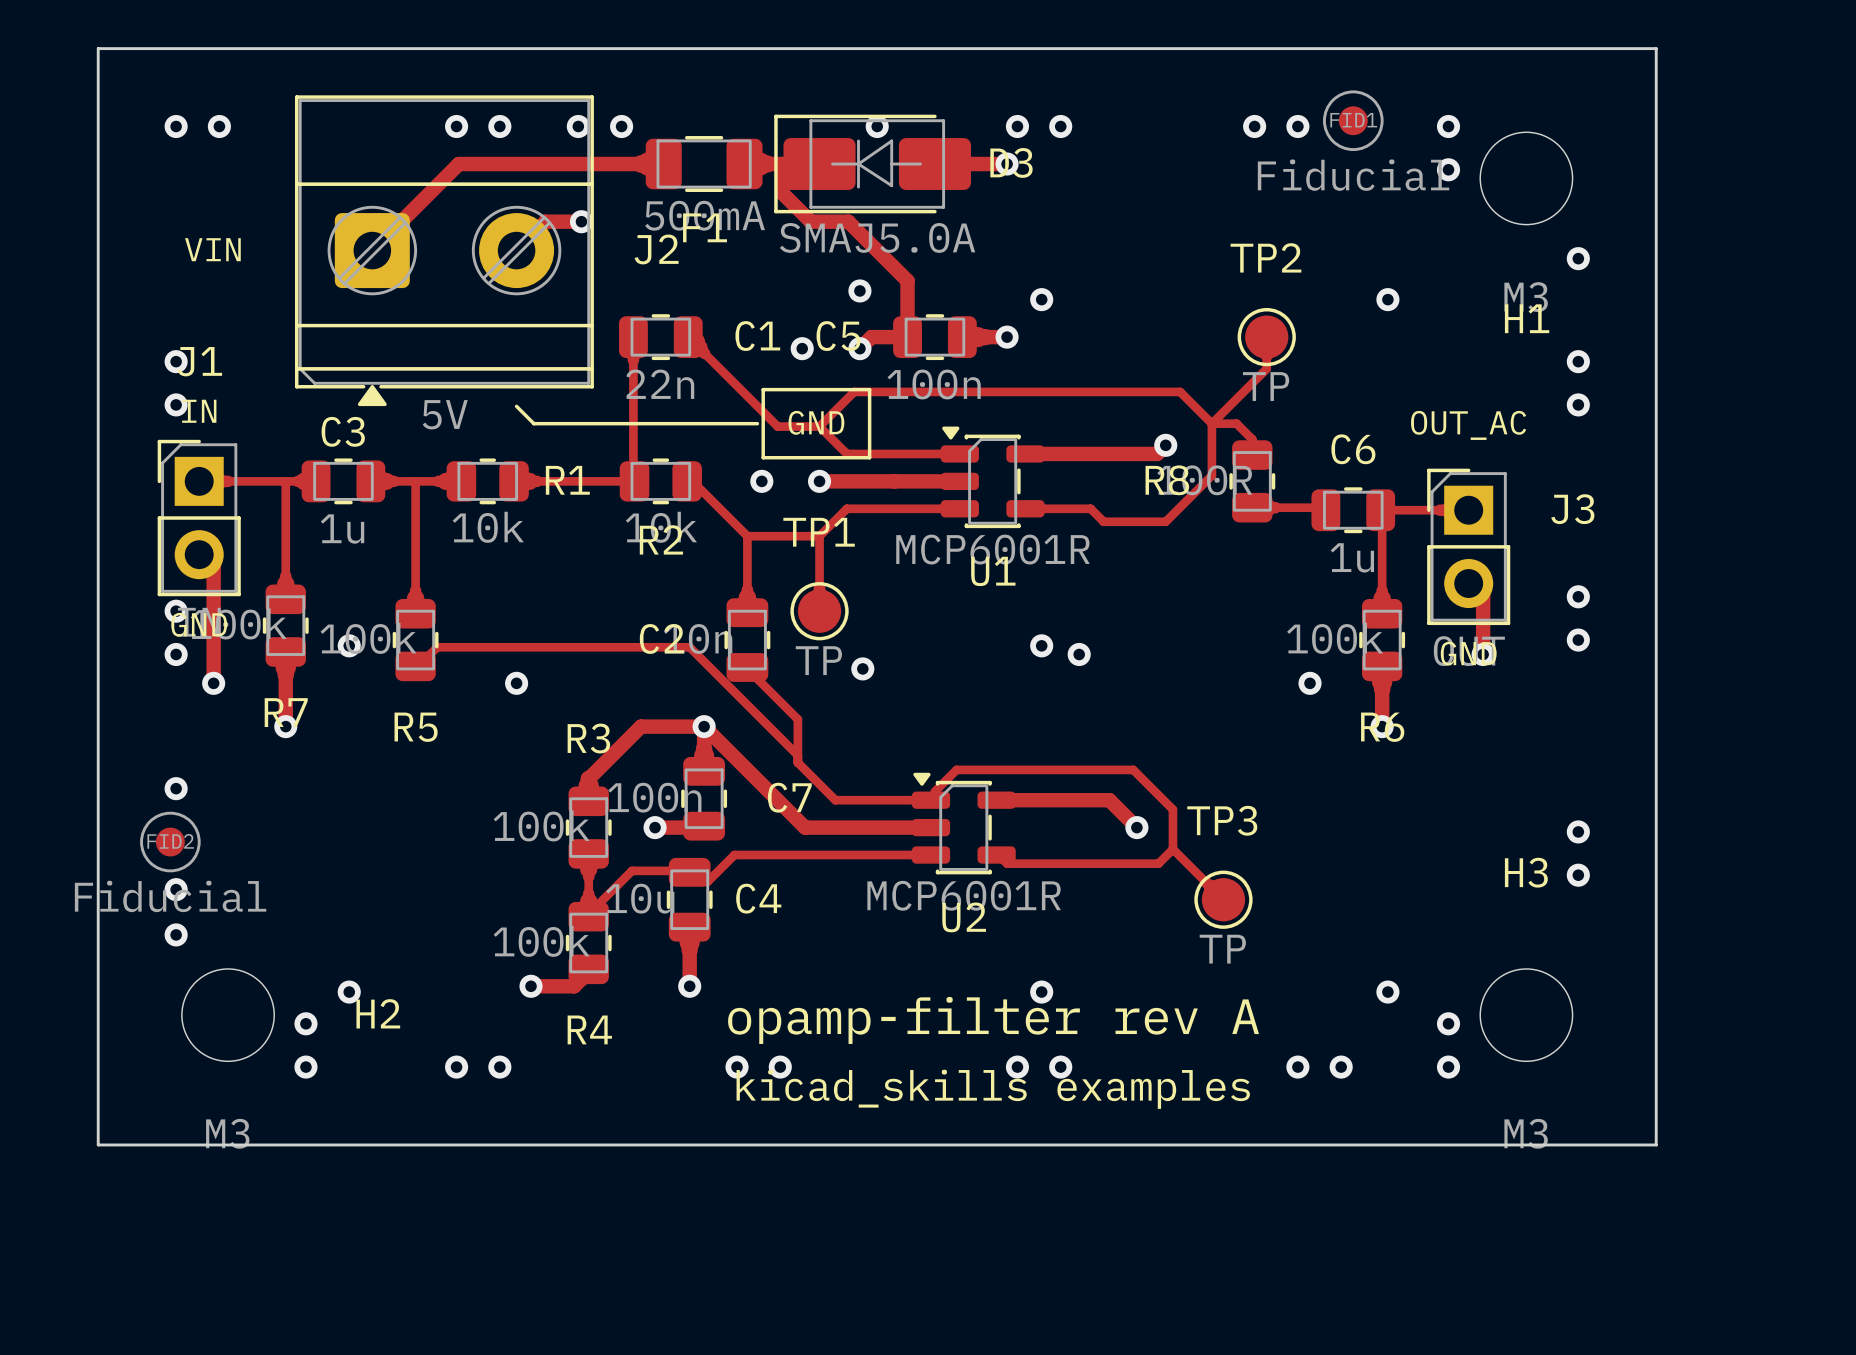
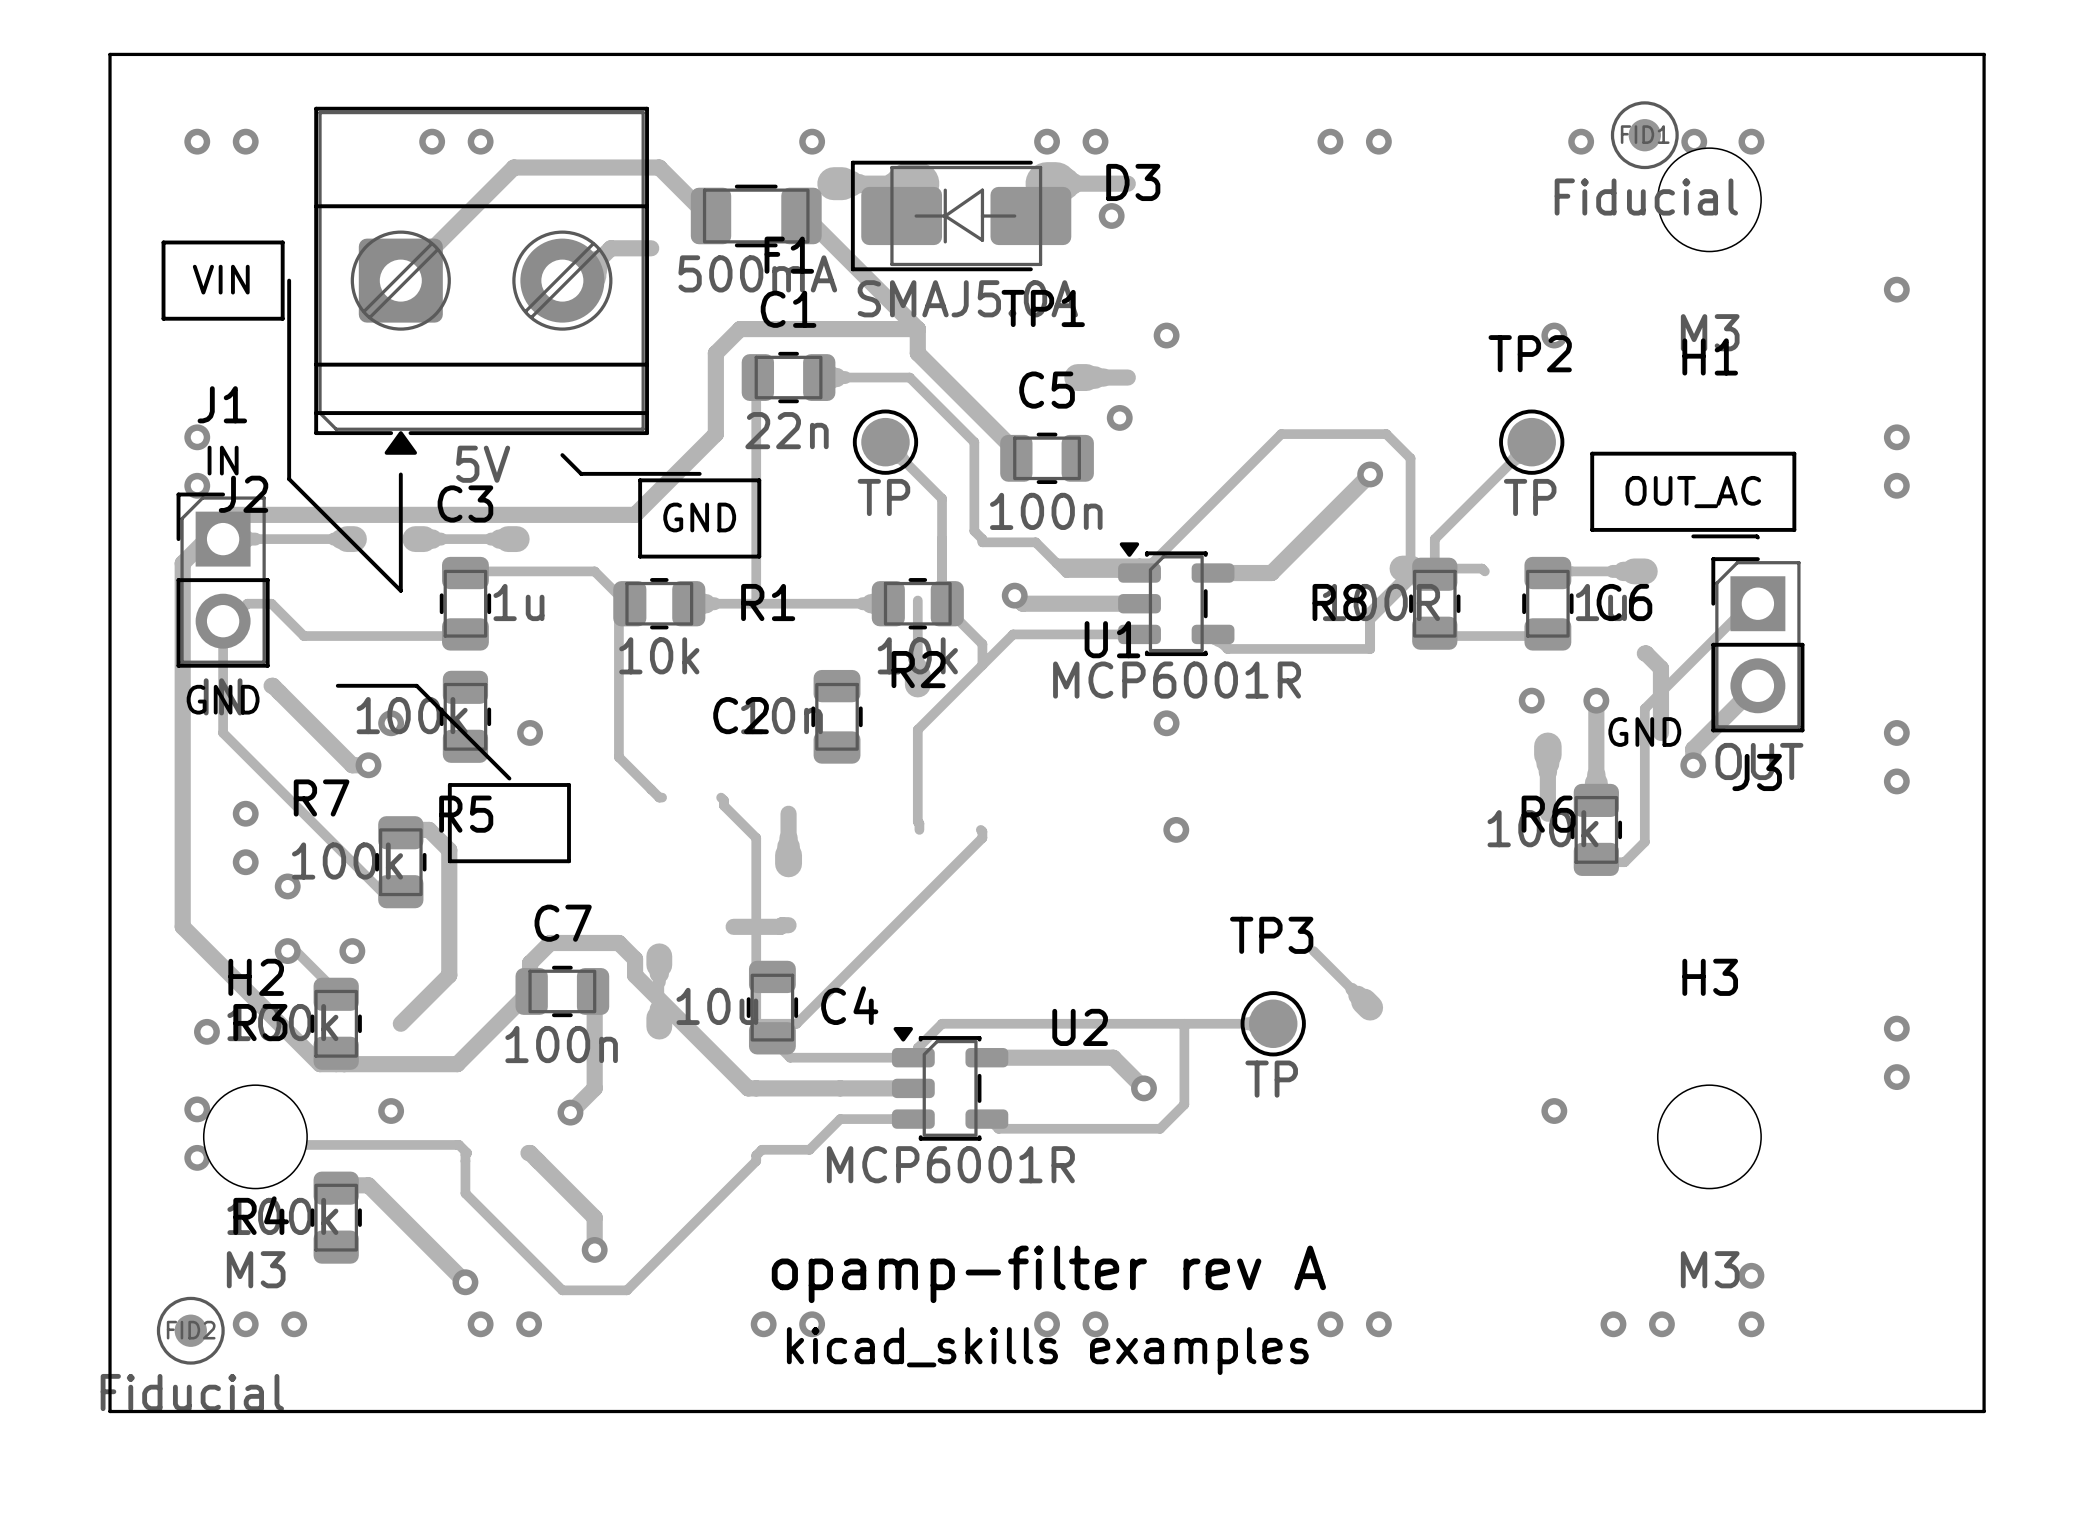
board edge: (1656, 48) (1656, 1144) (98, 1144) -> (1854, 54) (1984, 54) (1984, 1411) (110, 1411) (110, 1282)
FID1 position: (1353, 120) -> (1644, 135)
via: none -> (432, 141)
via position: (456, 126) -> (480, 141)
via: (499, 126) -> none
via: (578, 126) -> none
via: (621, 126) -> none
via: none -> (812, 141)
via: (877, 126) -> none
via: none -> (1047, 141)
via: none -> (1095, 141)
via: (1017, 126) -> none
via: (1060, 126) -> none
via: none -> (1330, 141)
via position: (1254, 126) -> (1378, 141)
via: (1297, 126) -> none
via: none -> (1581, 141)
via: (1448, 126) -> none
via: none -> (1694, 141)
via: none -> (1751, 141)
track: (663, 164) (458, 164) (372, 250) -> none
F1 position: (704, 164) -> (756, 215)
track: (782, 164) (782, 192) (810, 221) (848, 221) (907, 280) (907, 337) (871, 337) (859, 348) -> none
D3 position: (872, 164) -> (961, 215)
via: (1007, 164) -> none
via: (1448, 169) -> none
track: none -> (711, 215) (702, 207) (699, 207) (659, 167) (513, 167) (400, 280)
track: none -> (804, 215) (917, 329)
via: none -> (1111, 215)
line: none -> (163, 242) (282, 242) (282, 318) (163, 318) (163, 242)
via: (581, 221) -> none
text position: VIN (212, 249) -> VIN (221, 279)
J2 name position: J2 (656, 249) -> J2 (243, 494)
line: none -> (289, 280) (289, 479) (400, 590) (400, 474)
J2 position: (444, 250) -> (481, 280)
via: (1578, 258) -> none
via: none -> (1896, 289)
via: (859, 290) -> none
track: none -> (917, 329) (740, 329) (715, 353) (715, 434) (635, 514) (231, 514) (182, 563) (182, 926) (320, 1064) (457, 1064) (530, 991) (530, 963) (550, 942) (618, 942) (635, 959) (635, 975) (748, 1088) (913, 1088)
track: none -> (917, 329) (917, 353) (1014, 450) (1016, 458)
C1 name position: C1 (757, 336) -> C1 (788, 309)
C5 name position: C5 (838, 336) -> C5 (1047, 390)
track: (633, 337) (633, 481) (514, 481) -> none
C1 position: (660, 337) -> (788, 377)
track: none -> (757, 377) (756, 385) (756, 603)
track: (688, 337) (777, 426) (819, 426) -> none
track: none -> (819, 377) (909, 377) (974, 442) (974, 531) (982, 539) (982, 542) (1035, 542) (1066, 573) (1139, 573)
C5 position: (934, 337) -> (1047, 458)
via position: (1007, 337) -> (1119, 417)
track: (1266, 337) (1266, 368) (1211, 423) -> none
TP2 position: (1266, 337) -> (1531, 442)
via: (802, 348) -> none
via: (859, 348) -> none
via: (176, 361) -> none
via: (1578, 361) -> none
line: (763, 389) (869, 389) (869, 457) (763, 457) (763, 389) -> (640, 480) (759, 480) (759, 556) (640, 556) (640, 480)
via: none -> (1896, 437)
track: none -> (885, 442) (942, 498) (942, 603) (982, 644) (982, 665)
track: none -> (1531, 442) (1434, 539) (1434, 571) (1418, 571) (1370, 619)
via position: (176, 404) -> (197, 437)
via: (1578, 404) -> none
line: none -> (1592, 453) (1794, 453) (1794, 529) (1592, 529) (1592, 453)
line: none -> (562, 455) (581, 473) (699, 473)
line: (516, 406) (533, 423) (757, 423) -> none
text position: GND (816, 422) -> GND (699, 517)
track: (1211, 423) (1236, 423) (1252, 439) (1252, 455) -> none
track: (1211, 423) (1180, 391) (854, 391) (819, 426) -> none
track: (1211, 423) (1211, 475) (1165, 521) (1103, 521) (1090, 508) (1025, 508) -> none
track: none -> (1370, 474) (1271, 573) (1213, 573)
text position: OUT_AC (1468, 425) -> OUT_AC (1693, 492)
track: (819, 426) (846, 453) (959, 453) -> none
via: none -> (197, 485)
via: none -> (1896, 485)
track: (1165, 445) (1157, 453) (1025, 453) -> none
via position: (1165, 445) -> (1370, 474)
U1 position: (992, 477) -> (1176, 599)
line: none -> (1693, 536) (1757, 537)
R1 name position: R1 (567, 480) -> R1 (768, 602)
track: (285, 481) (285, 599) -> none
C3 rotation: 0° (343, 481) -> 90° clockwise (465, 603)
C3 position: (343, 481) -> (465, 603)
track: (415, 481) (415, 613) -> none
R1 position: (487, 481) -> (659, 603)
R2 position: (660, 481) -> (917, 603)
track: (687, 481) (692, 481) (747, 536) -> none
via: (761, 481) -> none
track: (819, 481) (959, 481) -> none
via: (819, 481) -> none
R8 position: (1252, 481) -> (1434, 603)
track: none -> (1056, 563) (1152, 563) (1281, 434) (1386, 434) (1410, 458) (1410, 571) (1370, 611) (1370, 648) (1227, 648) (1213, 634)
track: (959, 508) (846, 508) (819, 536) (747, 536) -> none
J3 name position: J3 (1572, 509) -> J3 (1757, 772)
C6 rotation: 0° (1353, 510) -> 90° clockwise (1547, 603)
track: (1382, 510) (1382, 613) -> none
track: none -> (465, 573) (473, 571) (594, 571) (618, 595)
C3 value position: 1u (342, 529) -> 1u (518, 602)
track: none -> (618, 595) (618, 757) (659, 797) (662, 797)
track: none -> (1014, 595) (1022, 603) (1139, 603)
via: none -> (1014, 595)
TP1 name position: TP1 (819, 532) -> TP1 (1043, 308)
track: (747, 536) (747, 612) -> none
track: none -> (688, 603) (888, 603)
track: none -> (1757, 603) (1749, 603) (1644, 708) (1644, 842) (1624, 862) (1599, 862) (1596, 859)
J3 position: (1468, 546) -> (1757, 644)
track: (199, 554) (213, 567) (213, 683) -> none
C6 value position: 1u (1352, 557) -> 1u (1601, 602)
track: none -> (1434, 633) (1440, 633) (1442, 636) (1546, 636) (1547, 634)
track: none -> (465, 634) (463, 636) (303, 636) (271, 603) (247, 603) (223, 627) (223, 732) (384, 894) (400, 891)
track: none -> (1139, 634) (1013, 634) (917, 729) (919, 829)
via: (1578, 596) -> none
via: (176, 611) -> none
TP1 position: (819, 611) -> (885, 442)
track: none -> (271, 685) (352, 765) (368, 765)
line: none -> (337, 685) (416, 685) (509, 778)
track: none -> (1757, 685) (1693, 749) (1693, 765)
R7 position: (285, 625) -> (400, 862)
via: none -> (1531, 700)
track: none -> (1596, 700) (1596, 800)
via: none -> (1596, 700)
R6 position: (1382, 640) -> (1596, 829)
via: (1578, 640) -> none
track: (285, 651) (285, 726) -> none
via: (176, 654) -> none
via: (1079, 654) -> none
via: (1483, 654) -> none
via: none -> (1896, 732)
track: (415, 666) (437, 647) (689, 647) (797, 755) -> none
track: (747, 667) (797, 719) (797, 762) (835, 800) (930, 800) (934, 796) (934, 791) (956, 769) (1133, 769) (1172, 809) (1172, 849) (1158, 863) (1007, 863) (996, 855) -> none
via: (862, 668) -> none
via: (213, 683) -> none
via: none -> (368, 765)
via position: (516, 683) -> (530, 732)
via: (1310, 683) -> none
via: none -> (1693, 765)
via: none -> (1896, 781)
line: none -> (449, 784) (569, 784) (569, 861) (449, 861) (449, 784)
track: none -> (721, 797) (723, 800) (723, 805) (756, 837) (756, 1023)
via: none -> (245, 813)
via: (285, 726) -> none
via: (704, 726) -> none
via: (1382, 726) -> none
R3 name position: R3 (588, 738) -> R3 (260, 1022)
track: none -> (980, 829) (982, 837) (796, 1023) (756, 1023)
via: none -> (1176, 829)
track: none -> (400, 832) (406, 832) (408, 829) (429, 829) (449, 850) (449, 975) (400, 1023)
via: none -> (245, 862)
via: (176, 788) -> none
via: none -> (287, 886)
C7 value position: 100n (654, 797) -> 100n (561, 1044)
C7 name position: C7 (789, 797) -> C7 (563, 923)
C7 rotation: 0° (704, 798) -> 90° clockwise (562, 991)
C7 position: (704, 798) -> (562, 991)
track: (996, 800) (1109, 800) (1136, 827) -> (986, 1057) (1113, 1057) (1143, 1088)
track: (588, 801) (588, 778) (640, 726) (704, 726) (805, 827) (930, 827) -> none
U2 position: (963, 823) -> (950, 1083)
R3 position: (588, 827) -> (336, 1023)
via: (655, 827) -> none
via: (1136, 827) -> none
via: (1578, 831) -> none
FID2 position: (170, 842) -> (190, 1330)
track: none -> (287, 951) (295, 951) (336, 991) (336, 994)
via: none -> (287, 951)
via: none -> (352, 951)
track: (930, 855) (734, 855) (707, 881) (700, 881) (688, 870) (631, 870) (588, 914) -> none
via: (1578, 875) -> none
track: none -> (593, 991) (594, 1088) (570, 1112)
via: (176, 889) -> none
TP3 position: (1223, 899) -> (1273, 1023)
track: none -> (756, 1023) (790, 1057) (913, 1057) (917, 1053) (917, 1048) (942, 1023) (1273, 1023)
track: none -> (1184, 1023) (1184, 1104) (1160, 1128) (998, 1128) (986, 1119)
via: none -> (1896, 1028)
track: (689, 927) (689, 986) -> none
via position: (176, 934) -> (206, 1031)
R4 position: (588, 943) -> (336, 1217)
via: none -> (1896, 1077)
track: (588, 969) (588, 971) (574, 986) (531, 986) -> none
via position: (531, 986) -> (570, 1112)
via: (689, 986) -> none
via: none -> (197, 1109)
via position: (1041, 992) -> (1143, 1088)
track: none -> (913, 1119) (840, 1119) (809, 1149) (761, 1149) (756, 1155) (756, 1161) (626, 1290) (562, 1290) (465, 1193) (465, 1154) (467, 1153) (458, 1144) (287, 1144)
H2 name position: H2 (378, 1013) -> H2 (256, 977)
text position: opamp-filter rev A (993, 1020) -> opamp-filter rev A (1048, 1274)
via: (305, 1023) -> none
via: (1448, 1023) -> none
track: none -> (528, 1153) (594, 1217) (594, 1249)
R4 name position: R4 (589, 1029) -> R4 (261, 1215)
via: none -> (197, 1157)
track: none -> (336, 1188) (341, 1188) (344, 1185) (368, 1185) (465, 1282)
via: (305, 1067) -> none
via: (456, 1067) -> none
via: (499, 1067) -> none
via: (737, 1067) -> none
via: (780, 1067) -> none
via: (1017, 1067) -> none
via: (1060, 1067) -> none
via: (1297, 1067) -> none
via: (1341, 1067) -> none
via: (1448, 1067) -> none
text position: kicad_skills examples (993, 1089) -> kicad_skills examples (1047, 1351)
via: none -> (594, 1249)
via: none -> (1751, 1275)
via: none -> (465, 1282)
via: none -> (245, 1324)
via: none -> (294, 1324)
via: none -> (480, 1324)
via: none -> (529, 1324)
via: none -> (763, 1324)
via: none -> (812, 1324)
via: none -> (1047, 1324)
via: none -> (1095, 1324)
via: none -> (1330, 1324)
via: none -> (1378, 1324)
via: none -> (1613, 1324)
via: none -> (1661, 1324)
via: none -> (1751, 1324)

